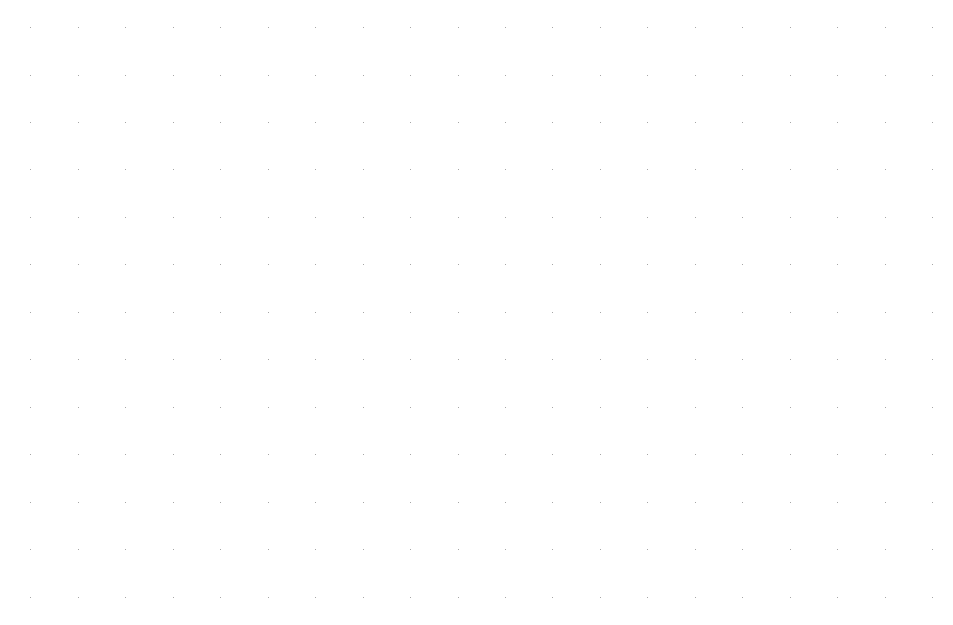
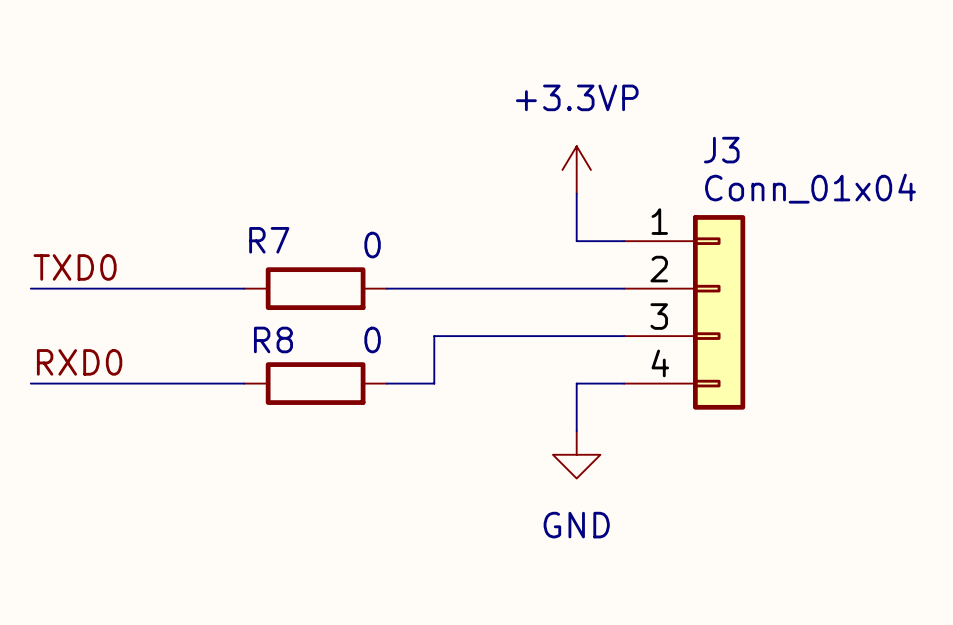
power symbol: none -> +3.3VP (576, 169)
wire: none -> (576, 193) (576, 241) (624, 241)
label: none -> TXD0 (75, 267)
wire: none -> (30, 288) (244, 288)
R7: none -> 0 (315, 288)
wire: none -> (386, 288) (624, 288)
J3: none -> Conn_01x04 (684, 312)
wire: none -> (624, 336) (434, 336) (434, 383) (386, 383)
label: none -> RXD0 (79, 362)
wire: none -> (30, 383) (244, 383)
R8: none -> 0 (315, 383)
wire: none -> (624, 383) (576, 383) (576, 431)
power symbol: none -> GND (576, 454)

